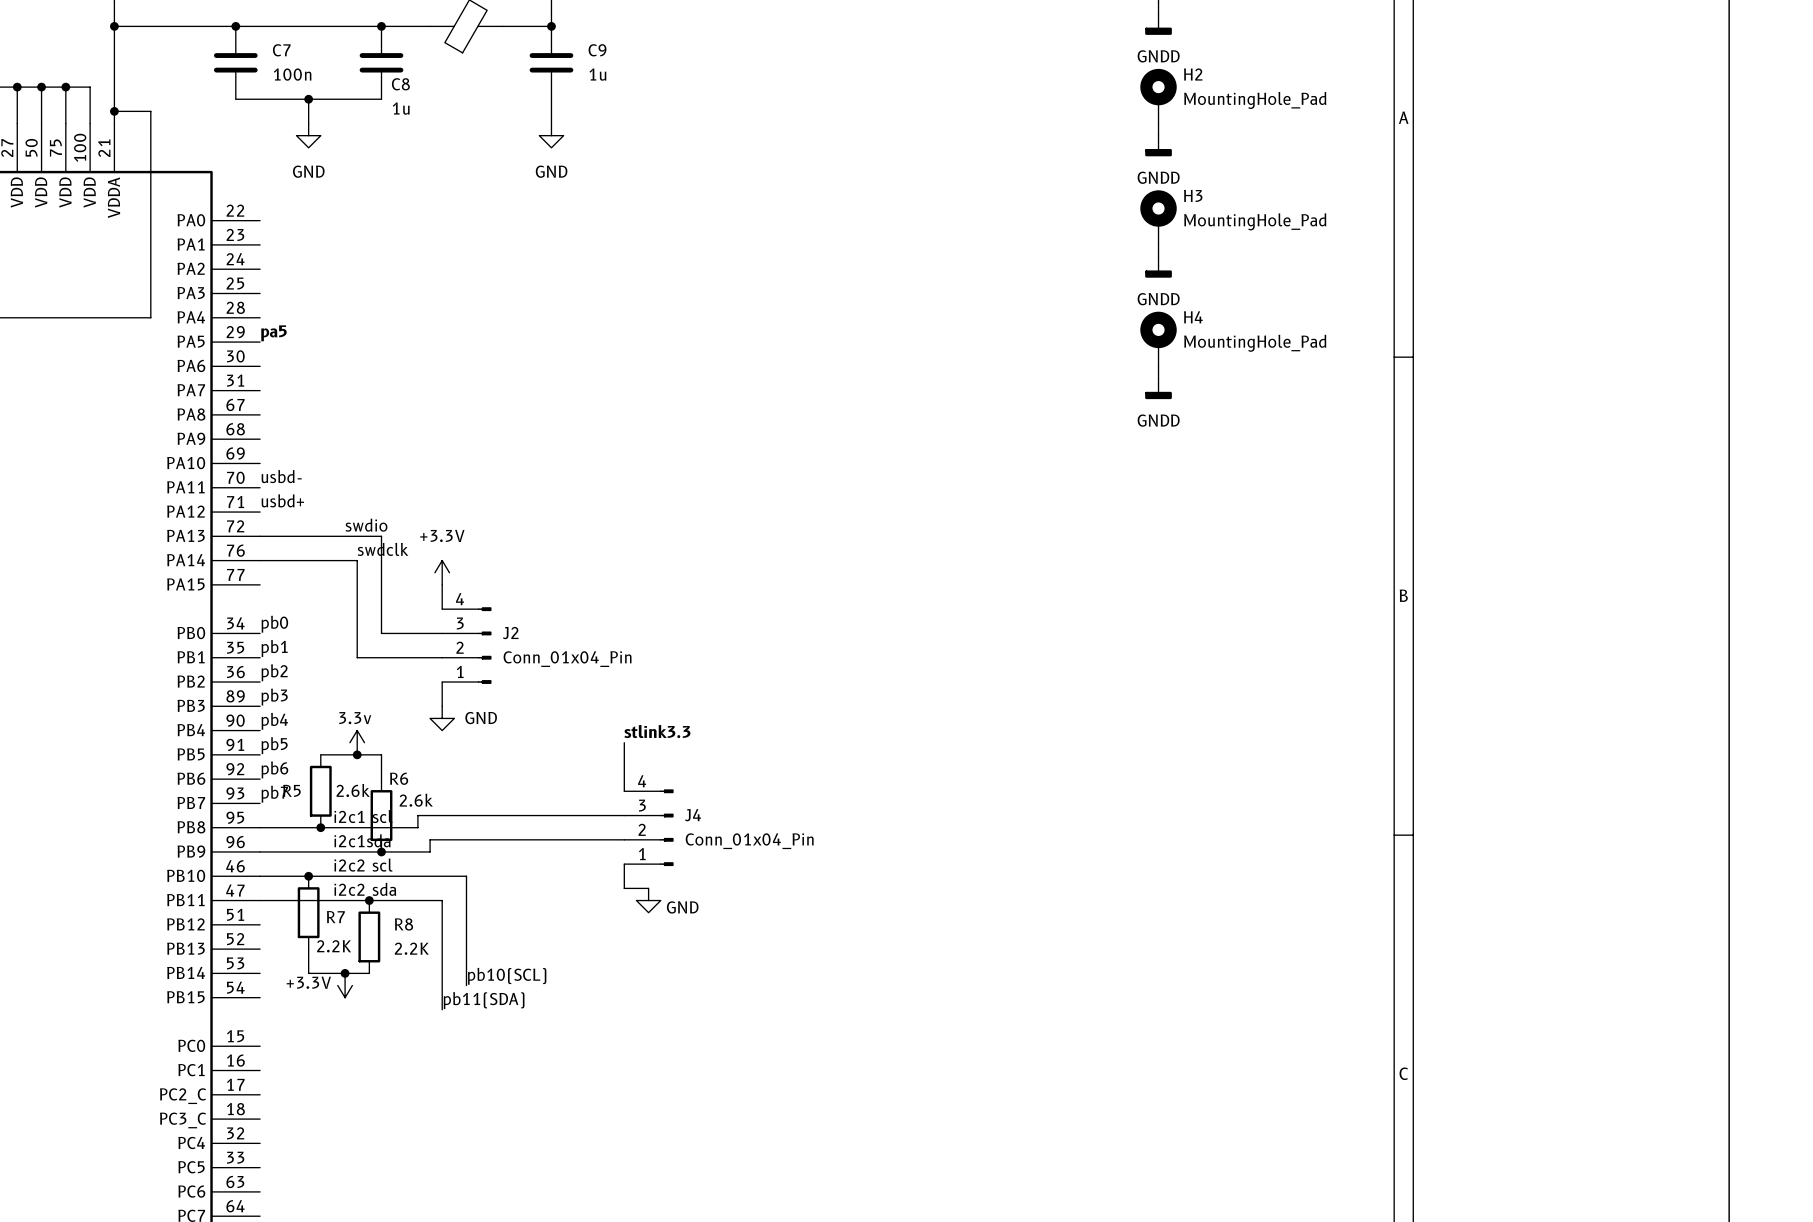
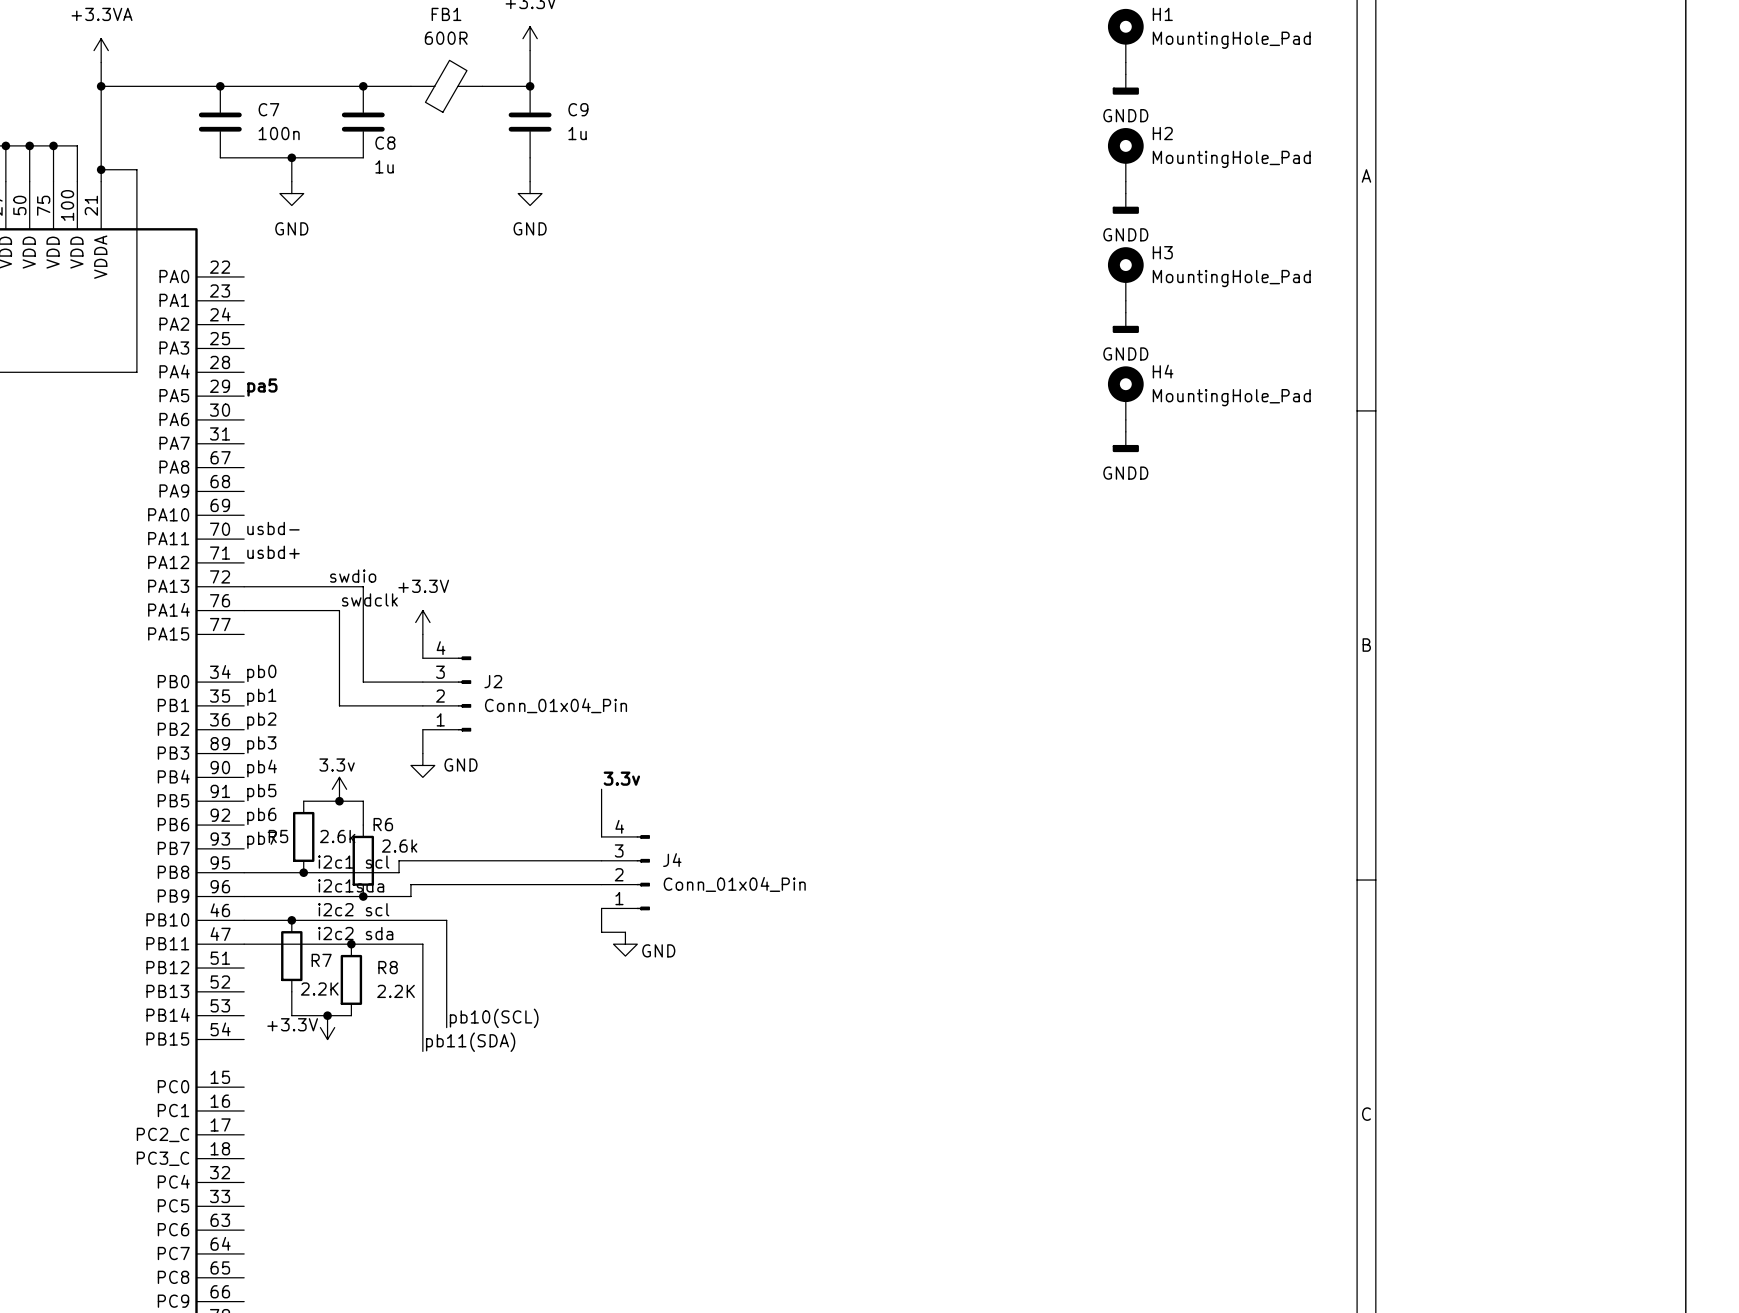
label: stlink3.3 (657, 731) -> 3.3v (621, 778)

